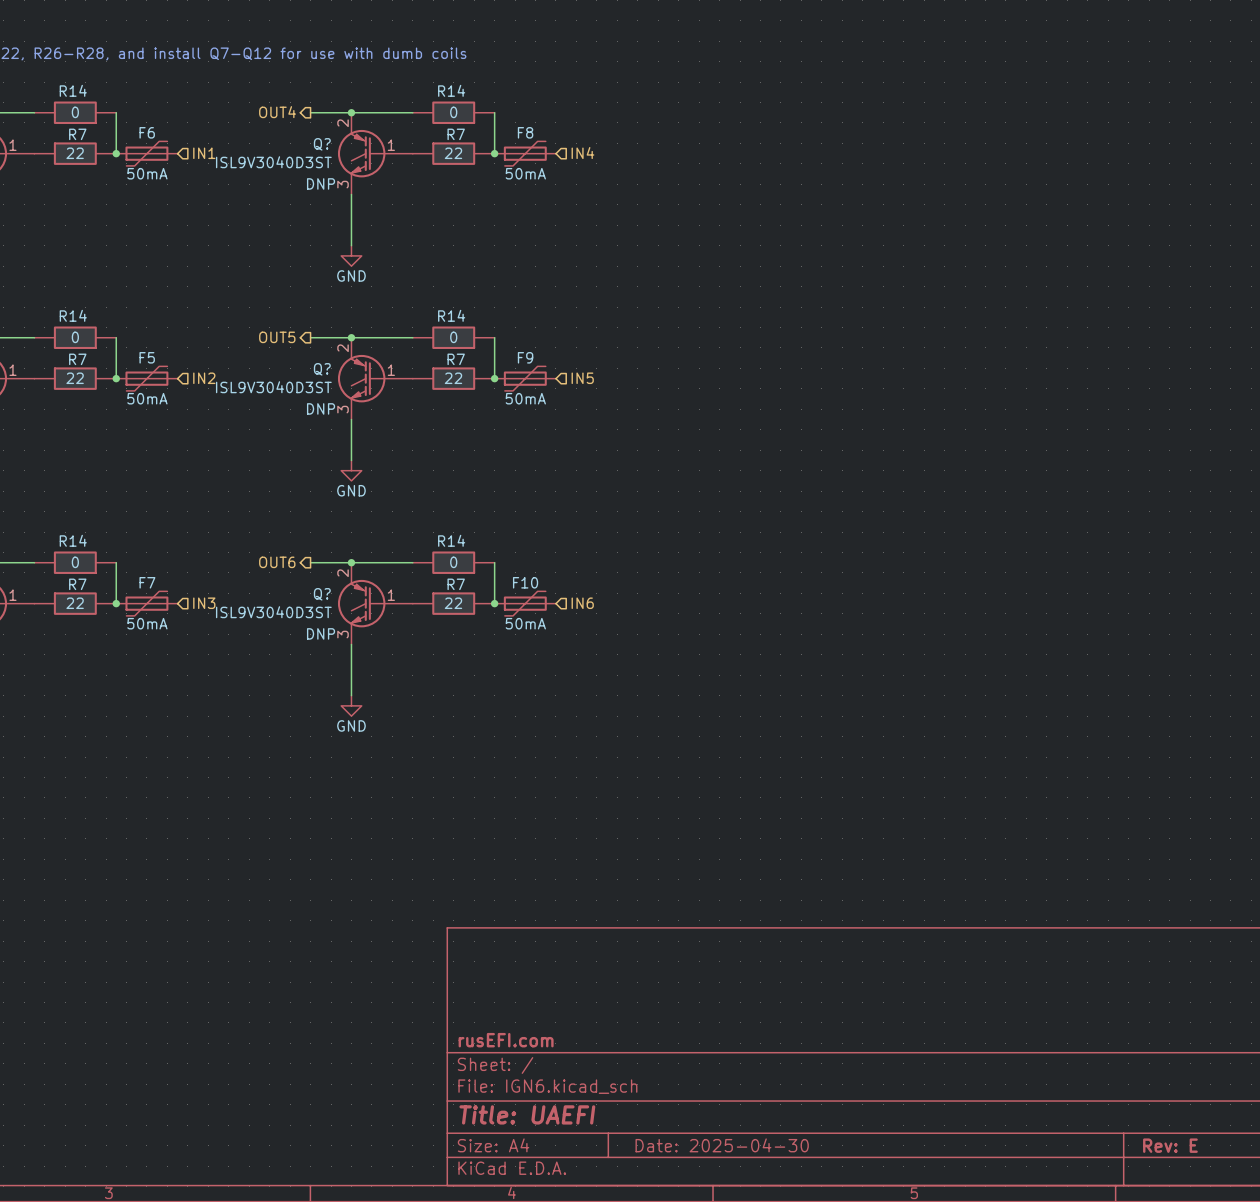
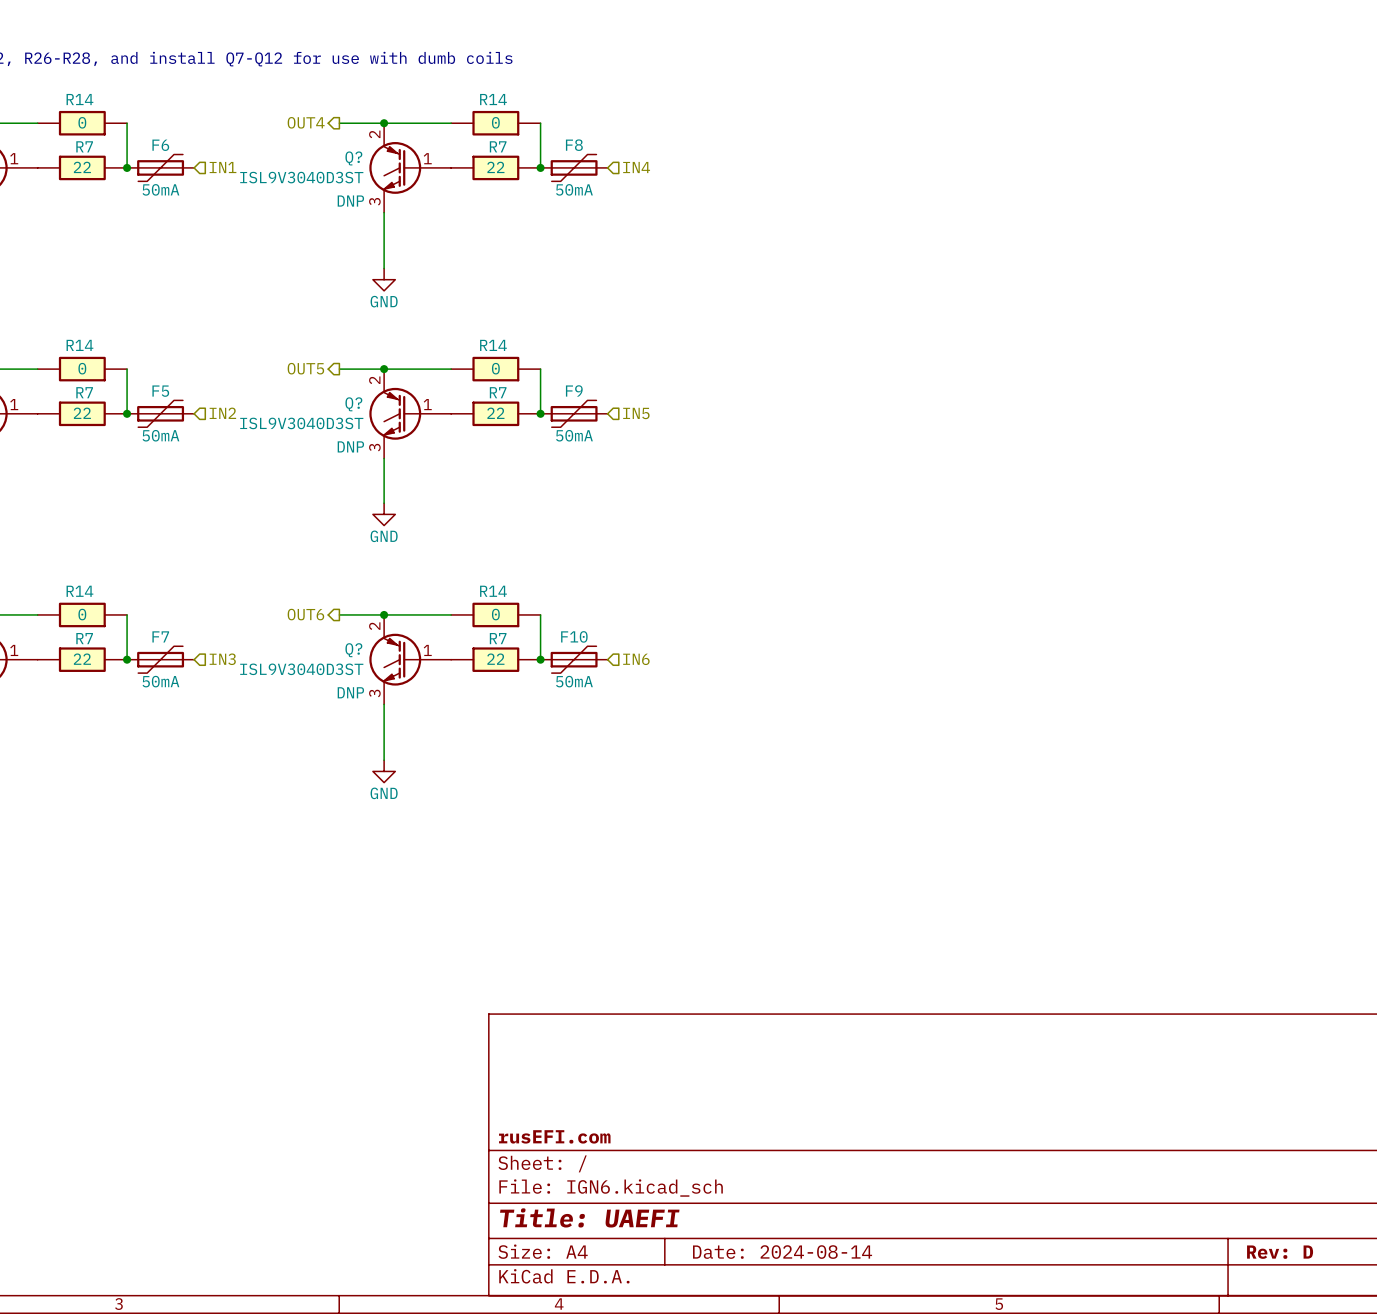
title block: Date: 2025-04-30 (722, 1145) -> Date: 2024-08-14 (782, 1252)
title block: Rev: E (1170, 1145) -> Rev: D (1280, 1252)

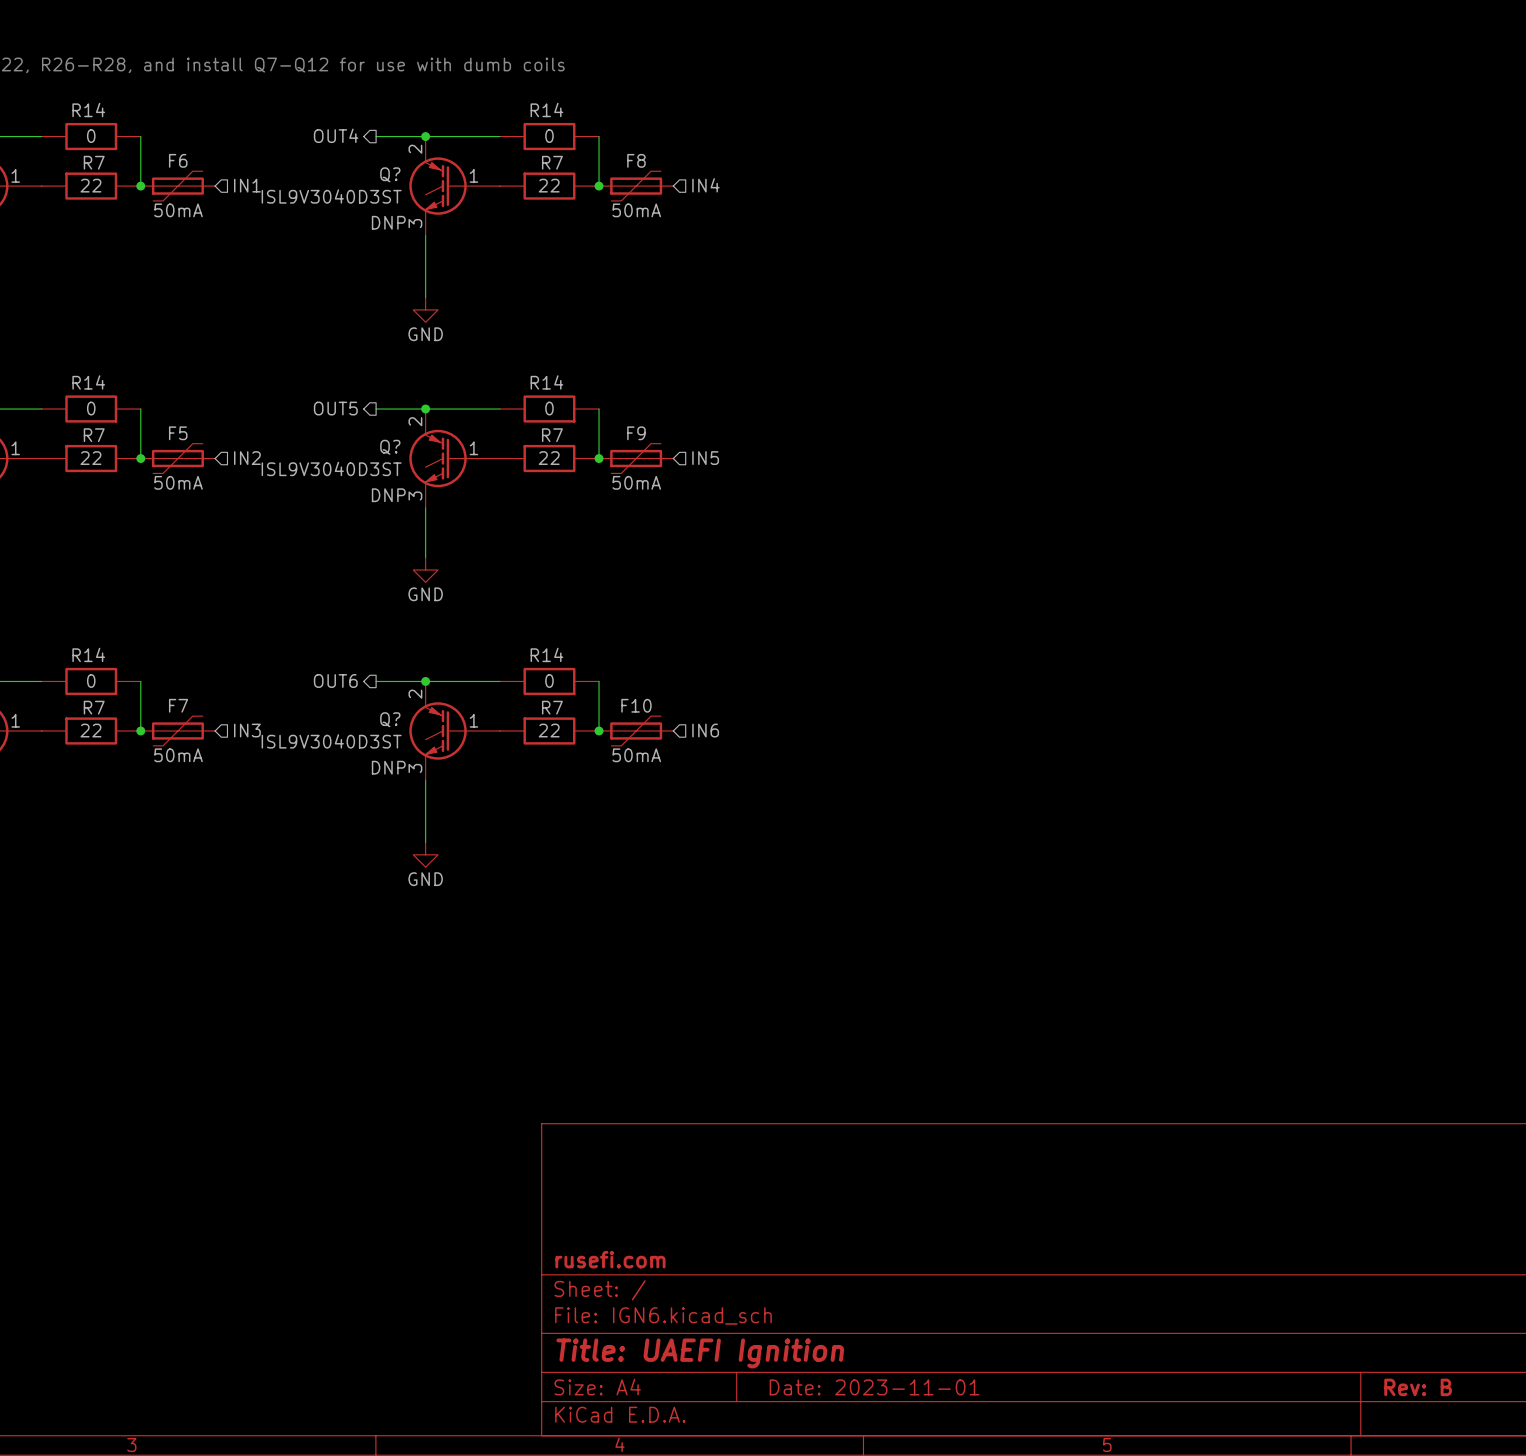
title block: rusEFI.com (554, 1136) -> rusefi.com (610, 1259)
title block: Title: UAEFI (589, 1217) -> Title: UAEFI Ignition (700, 1353)
title block: Date: 2024-08-14 (782, 1252) -> Date: 2023-11-01 (874, 1387)
title block: Rev: D (1280, 1252) -> Rev: B (1418, 1387)

